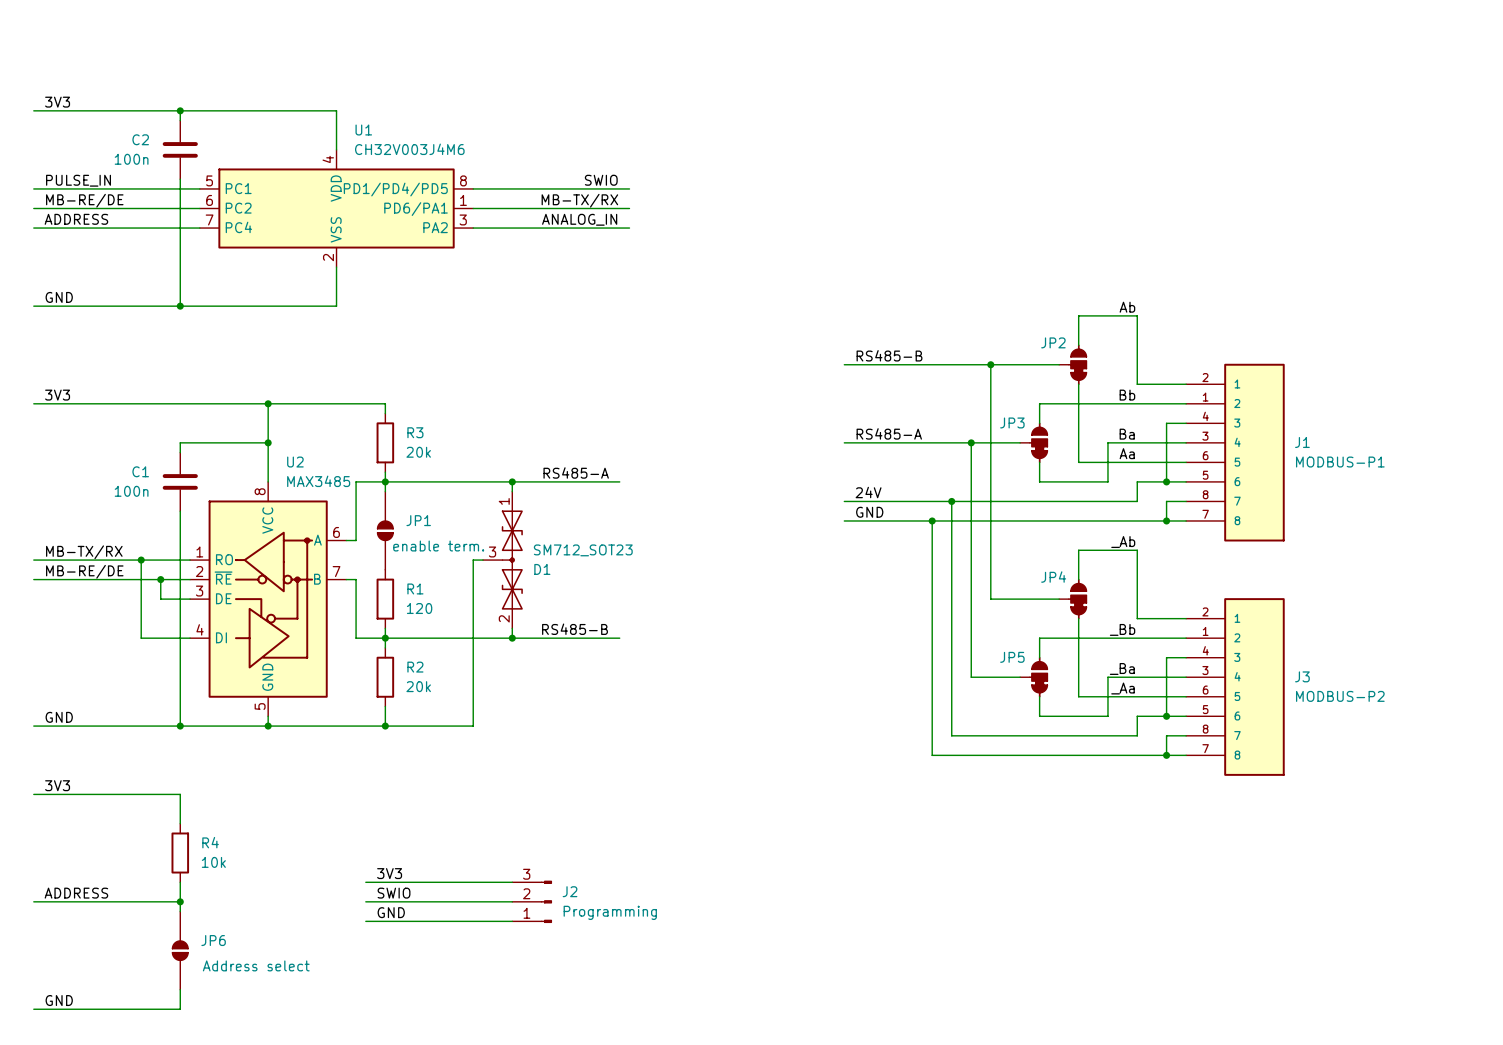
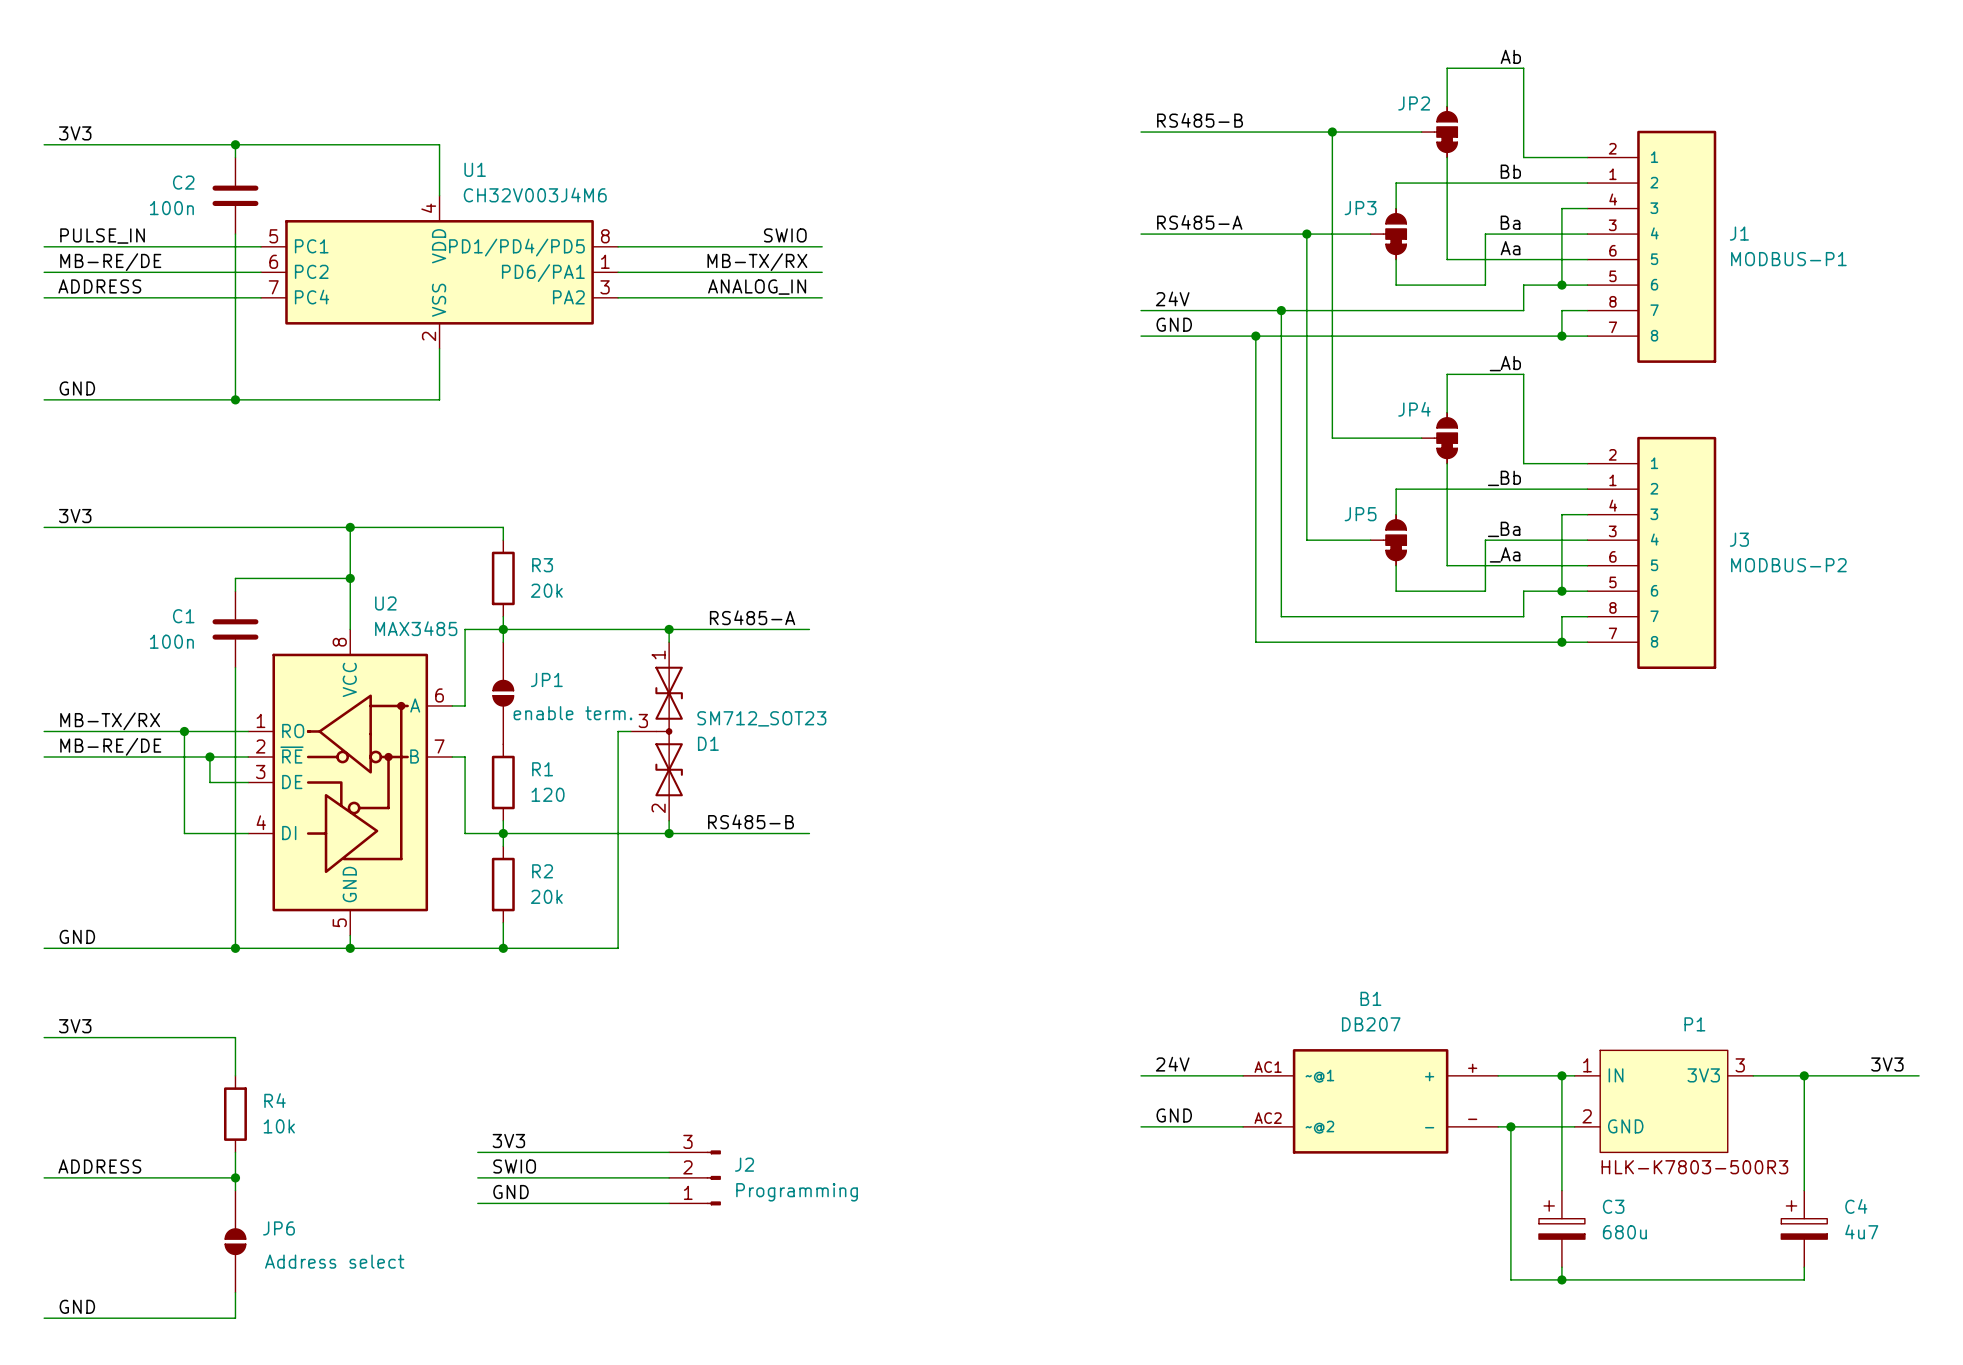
label: none -> Ab (1510, 56)
wire: none -> (1447, 106) (1447, 68) (1523, 68) (1523, 157) (1587, 157)
label: none -> RS485-B (1200, 120)
wire: none -> (1141, 132) (1421, 132)
wire: none -> (1332, 132) (1332, 438) (1421, 438)
junction: none -> (1332, 132)
wire: none -> (1447, 157) (1447, 259) (1587, 259)
label: none -> Bb (1510, 171)
wire: none -> (1587, 183) (1396, 183) (1396, 208)
wire: none -> (1587, 208) (1561, 208) (1561, 285)
label: none -> RS485-A (1199, 222)
label: none -> Ba (1510, 222)
wire: none -> (1141, 234) (1370, 234)
wire: none -> (1306, 234) (1306, 540) (1370, 540)
junction: none -> (1306, 234)
wire: none -> (1587, 234) (1485, 234) (1485, 285) (1396, 285) (1396, 259)
label: none -> Aa (1510, 248)
junction: none -> (1561, 285)
wire: none -> (1587, 285) (1523, 285) (1523, 310) (1141, 310)
label: none -> 24V (1172, 298)
junction: none -> (1281, 310)
wire: none -> (1587, 310) (1561, 310) (1561, 336)
label: none -> GND (1174, 324)
wire: none -> (1141, 336) (1587, 336)
wire: none -> (1255, 336) (1255, 642) (1587, 642)
junction: none -> (1255, 336)
junction: none -> (1561, 336)
label: none -> _Ab (1505, 363)
label: Ab (1127, 307) -> none
wire: (1078, 345) (1078, 315) (1137, 315) (1137, 384) (1186, 384) -> (1447, 412) (1447, 374) (1523, 374) (1523, 463) (1587, 463)
label: RS485-B (889, 355) -> none
wire: (844, 364) (1059, 364) -> none
wire: (990, 364) (990, 599) (1059, 599) -> none
junction: (990, 364) -> none
JP2 position: (1072, 364) -> (1439, 132)
label: none -> _Bb (1504, 478)
wire: (1078, 384) (1078, 462) (1186, 462) -> (1447, 463) (1447, 565) (1587, 565)
wire: none -> (1587, 514) (1561, 514) (1561, 591)
label: Bb (1127, 395) -> none
wire: (1186, 403) (1039, 403) (1039, 423) -> (1587, 489) (1396, 489) (1396, 514)
label: none -> _Ba (1504, 529)
wire: (1186, 423) (1166, 423) (1166, 452) -> (1587, 591) (1523, 591)
label: none -> _Aa (1505, 554)
label: RS485-A (889, 433) -> none
label: Ba (1127, 434) -> none
wire: (844, 442) (1020, 442) -> none
wire: (971, 442) (971, 677) (1020, 677) -> none
junction: (971, 442) -> none
JP3 position: (1033, 442) -> (1388, 234)
wire: (1186, 442) (1107, 442) (1107, 481) (1039, 481) (1039, 462) -> (1587, 540) (1485, 540) (1485, 591) (1396, 591) (1396, 565)
junction: none -> (1561, 591)
J1 position: (1235, 452) -> (1651, 246)
label: Aa (1127, 453) -> none
wire: (1166, 472) (1166, 481) -> (1523, 616) (1281, 616) (1281, 310)
junction: (1166, 481) -> none
wire: (1186, 481) (1137, 481) (1137, 501) (844, 501) -> none
junction: none -> (1561, 642)
label: 24V (868, 492) -> none
wire: (951, 501) (951, 735) (1137, 735) (1137, 716) (1186, 716) -> none
junction: (951, 501) -> none
wire: (1186, 501) (1166, 501) (1166, 520) -> (1587, 616) (1561, 616) (1561, 642)
label: GND (869, 512) -> none
wire: (844, 520) (1186, 520) -> none
wire: (932, 520) (932, 755) (1186, 755) -> none
junction: (932, 520) -> none
junction: (1166, 520) -> none
label: _Ab (1123, 542) -> none
wire: (1078, 579) (1078, 550) (1137, 550) (1137, 618) (1186, 618) -> none
JP4 position: (1072, 599) -> (1439, 438)
wire: (1078, 618) (1078, 696) (1186, 696) -> none
label: _Bb (1122, 629) -> none
wire: (1186, 638) (1039, 638) (1039, 657) -> none
wire: (1186, 657) (1166, 657) (1166, 716) -> none
label: _Ba (1122, 668) -> none
JP5 position: (1033, 677) -> (1388, 540)
wire: (1186, 677) (1107, 677) (1107, 716) (1039, 716) (1039, 696) -> none
J3 position: (1235, 687) -> (1651, 552)
label: _Aa (1123, 688) -> none
junction: (1166, 716) -> none
wire: (1186, 735) (1166, 735) (1166, 755) -> none
junction: (1166, 755) -> none
label: none -> 24V (1172, 1064)
label: none -> 3V3 (1887, 1064)
wire: none -> (1141, 1075) (1243, 1075)
wire: none -> (1498, 1075) (1574, 1075)
wire: none -> (1561, 1075) (1561, 1190)
junction: none -> (1561, 1075)
wire: none -> (1753, 1075) (1919, 1075)
wire: none -> (1804, 1075) (1804, 1190)
junction: none -> (1804, 1075)
B1: none -> DB207 (1370, 1101)
P1: none -> (1663, 1101)
label: none -> GND (1174, 1115)
wire: none -> (1141, 1126) (1243, 1126)
wire: none -> (1498, 1126) (1574, 1126)
wire: none -> (1510, 1126) (1510, 1279) (1804, 1279) (1804, 1267)
junction: none -> (1510, 1126)
C3: none -> 680u (1561, 1228)
C4: none -> 4u7 (1804, 1228)
wire: none -> (1561, 1267) (1561, 1279)
junction: none -> (1561, 1279)

